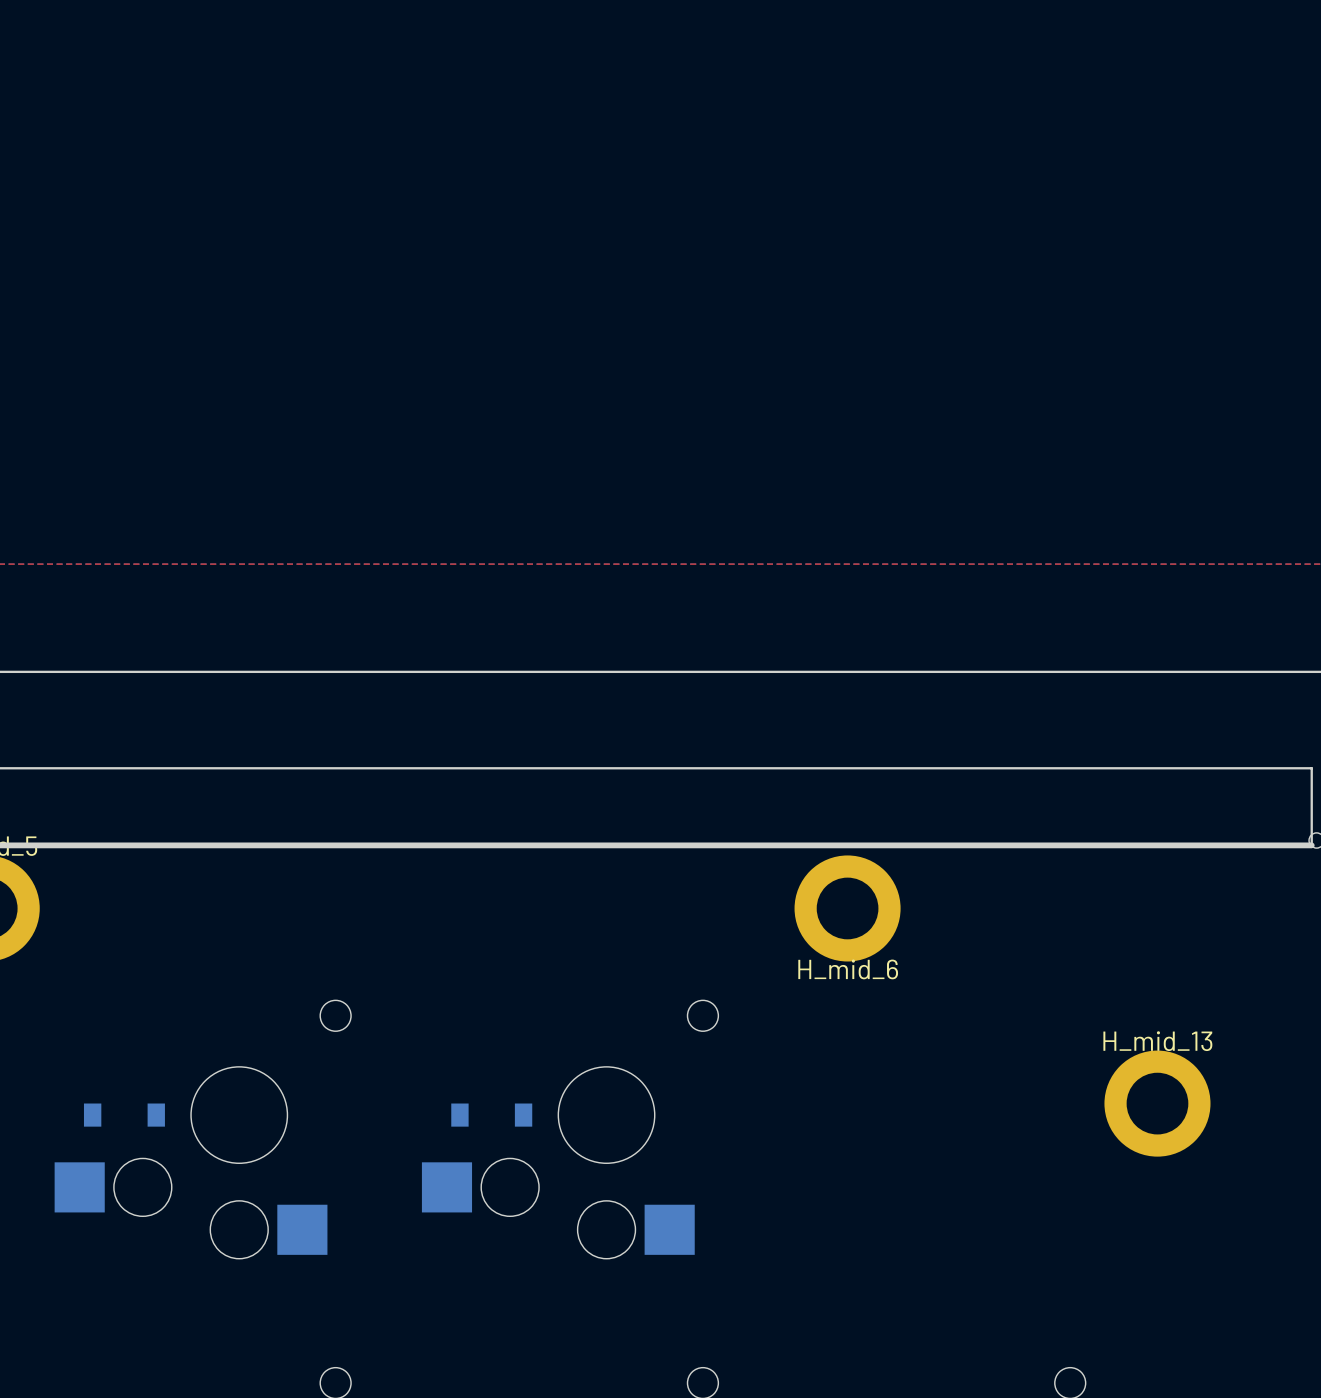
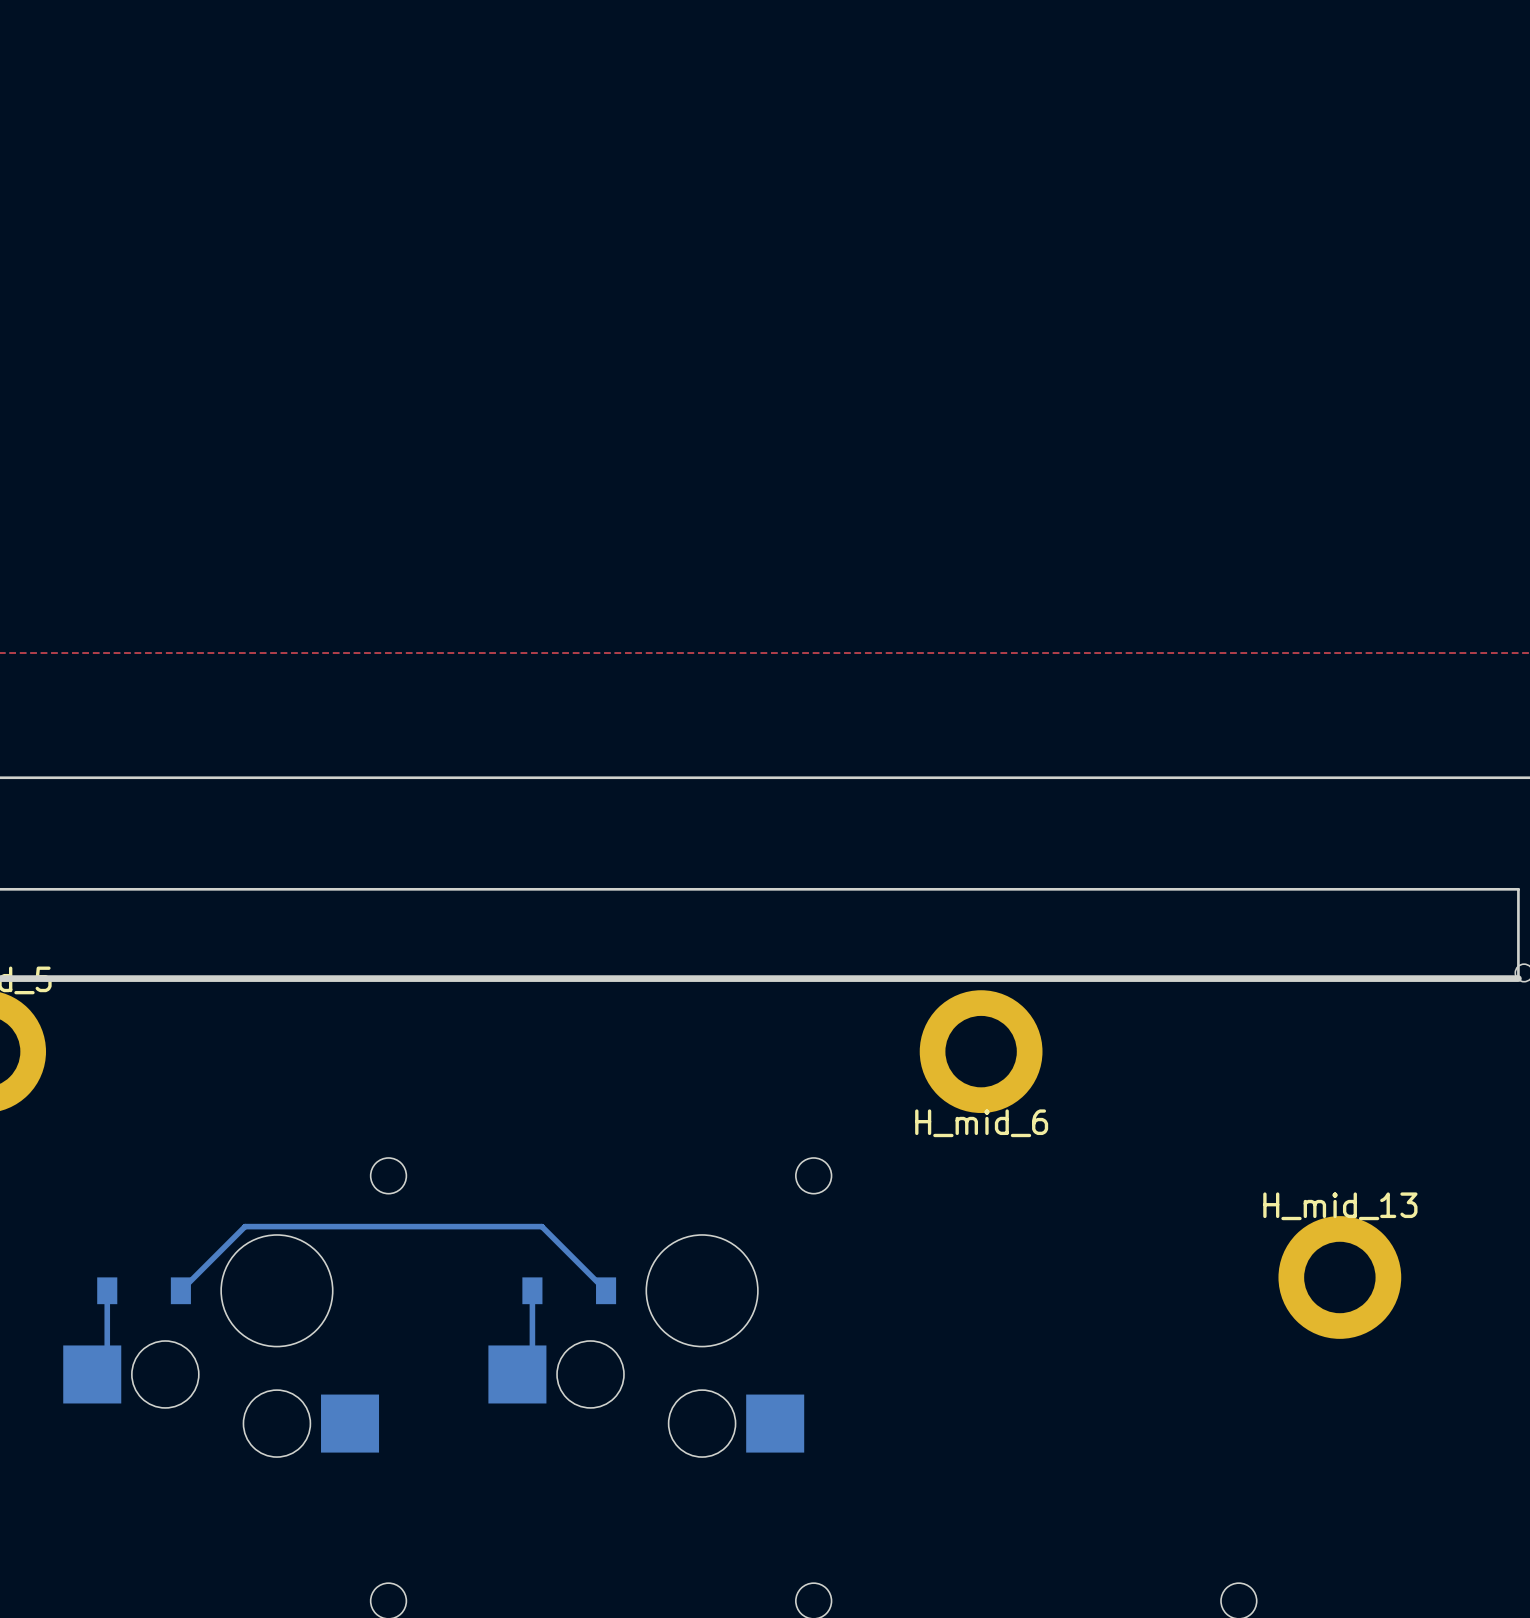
bottom track: none -> (107, 1290) (107, 1359) (92, 1374)
bottom track: none -> (180, 1290) (245, 1226) (541, 1226) (606, 1290)
bottom track: none -> (532, 1290) (532, 1359) (517, 1374)

